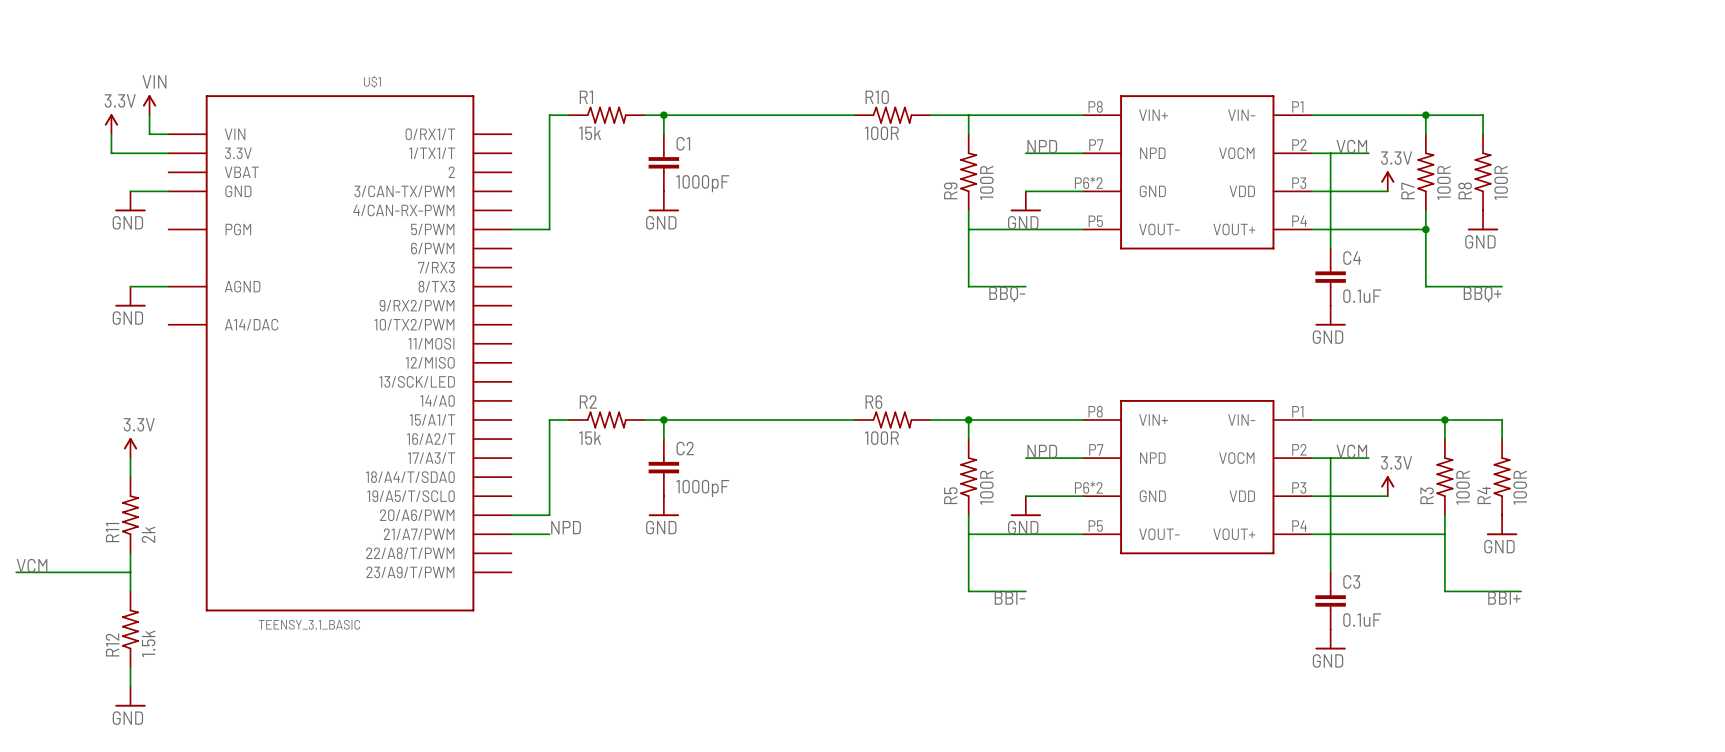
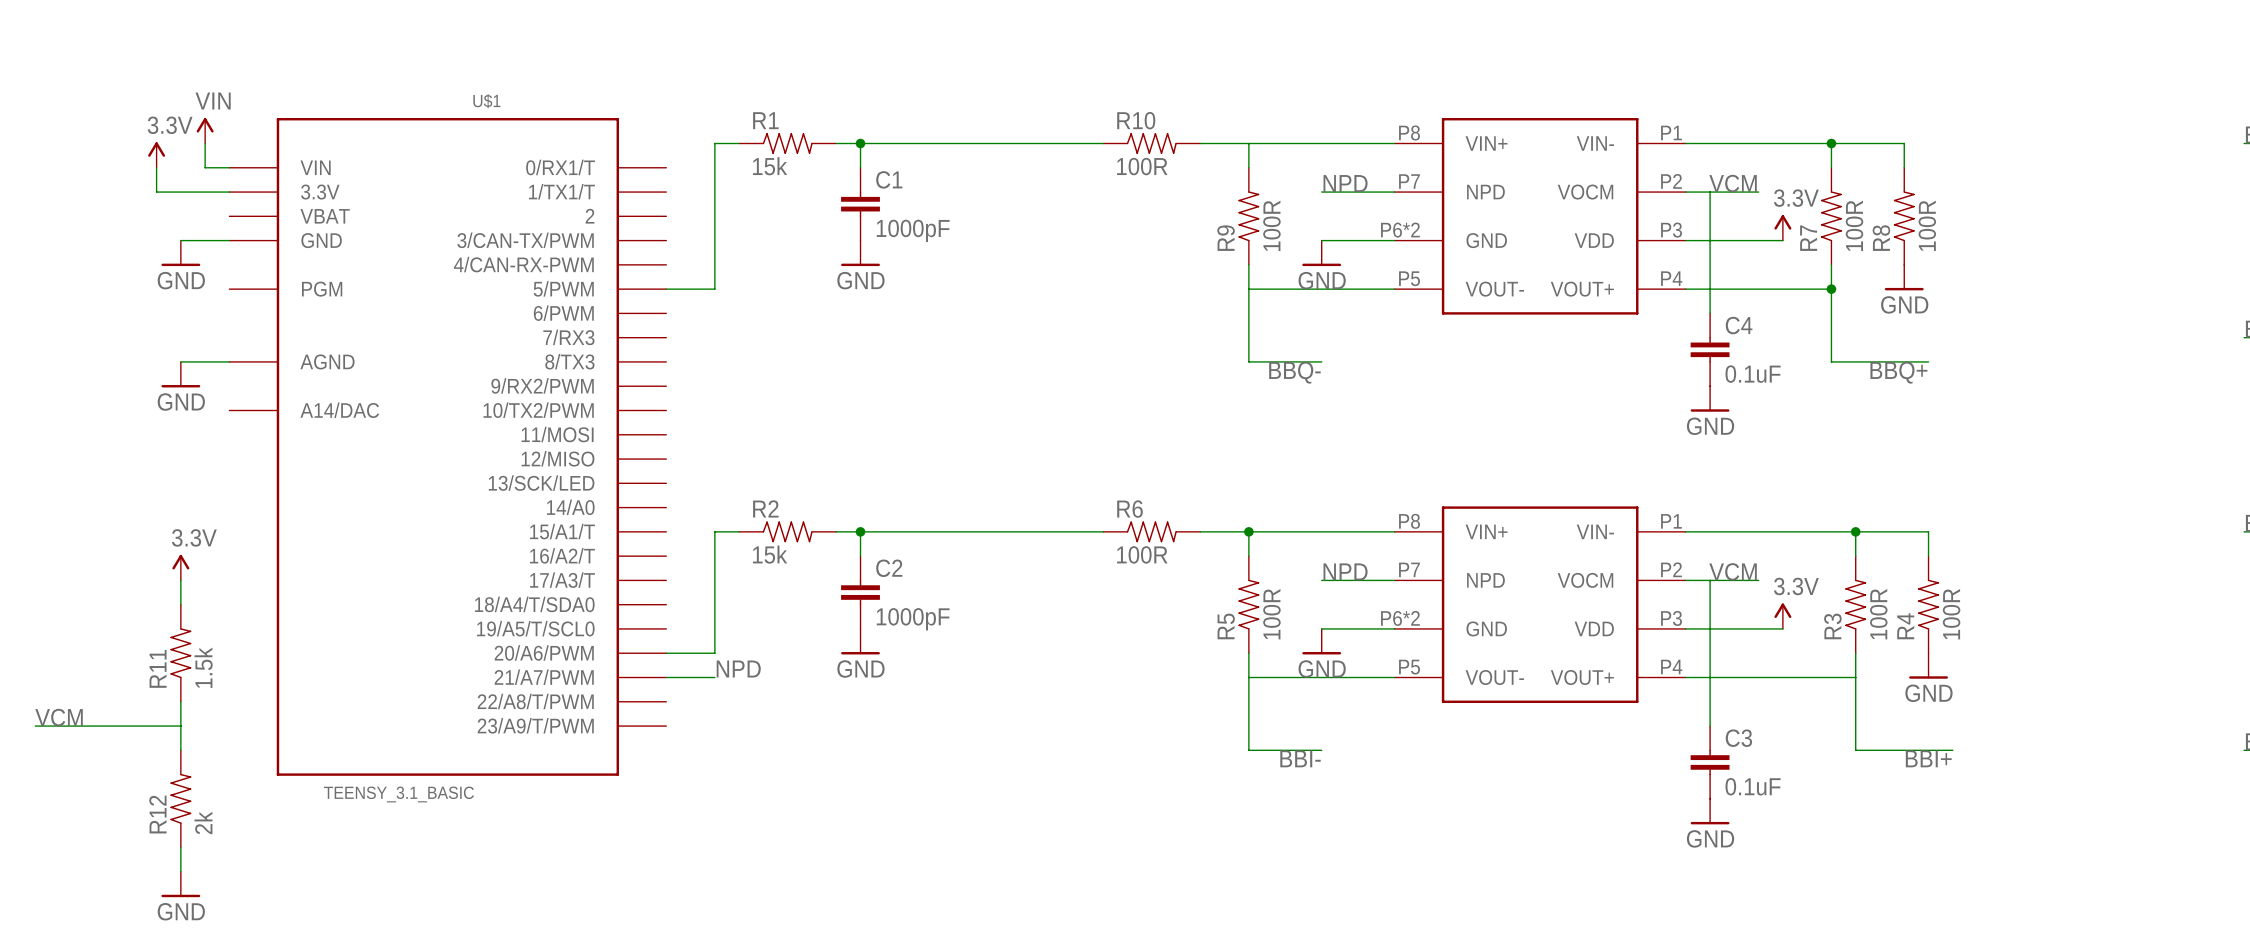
R11 value: 2k (148, 534) -> 1.5k (203, 667)
R12 value: 1.5k (148, 643) -> 2k (203, 822)

